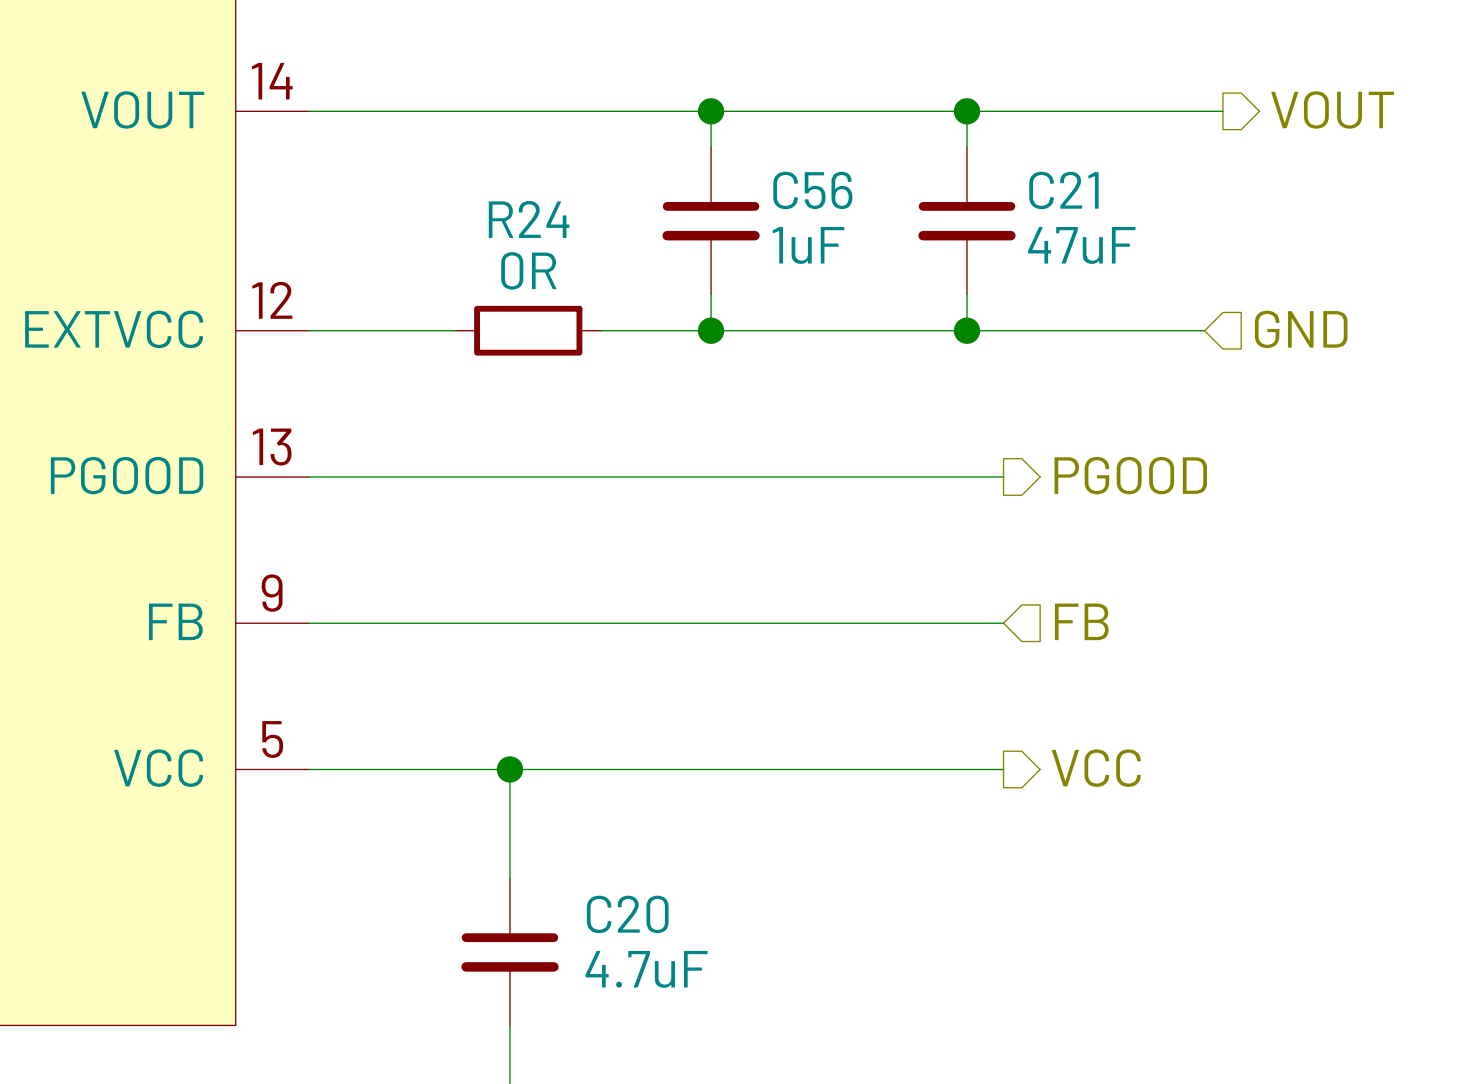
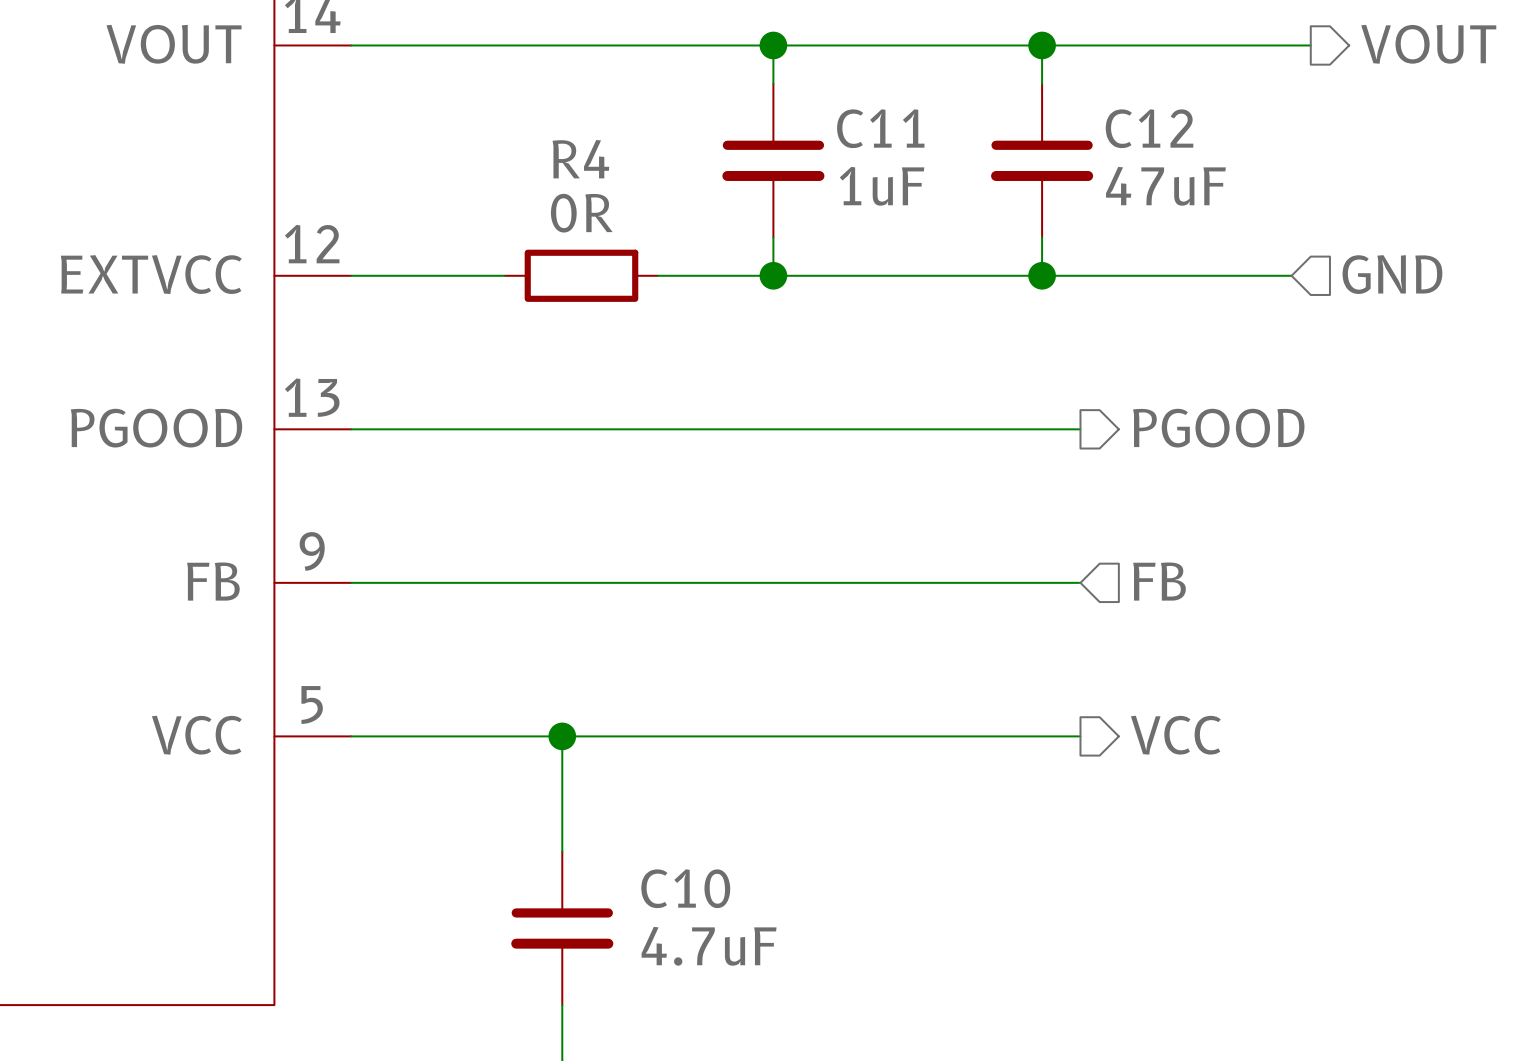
C56 name: C56 (812, 190) -> C11 (880, 128)
C21 name: C21 (1063, 190) -> C12 (1149, 128)
R24 name: R24 (529, 219) -> R4 (580, 159)
C20 name: C20 (627, 914) -> C10 (685, 888)

